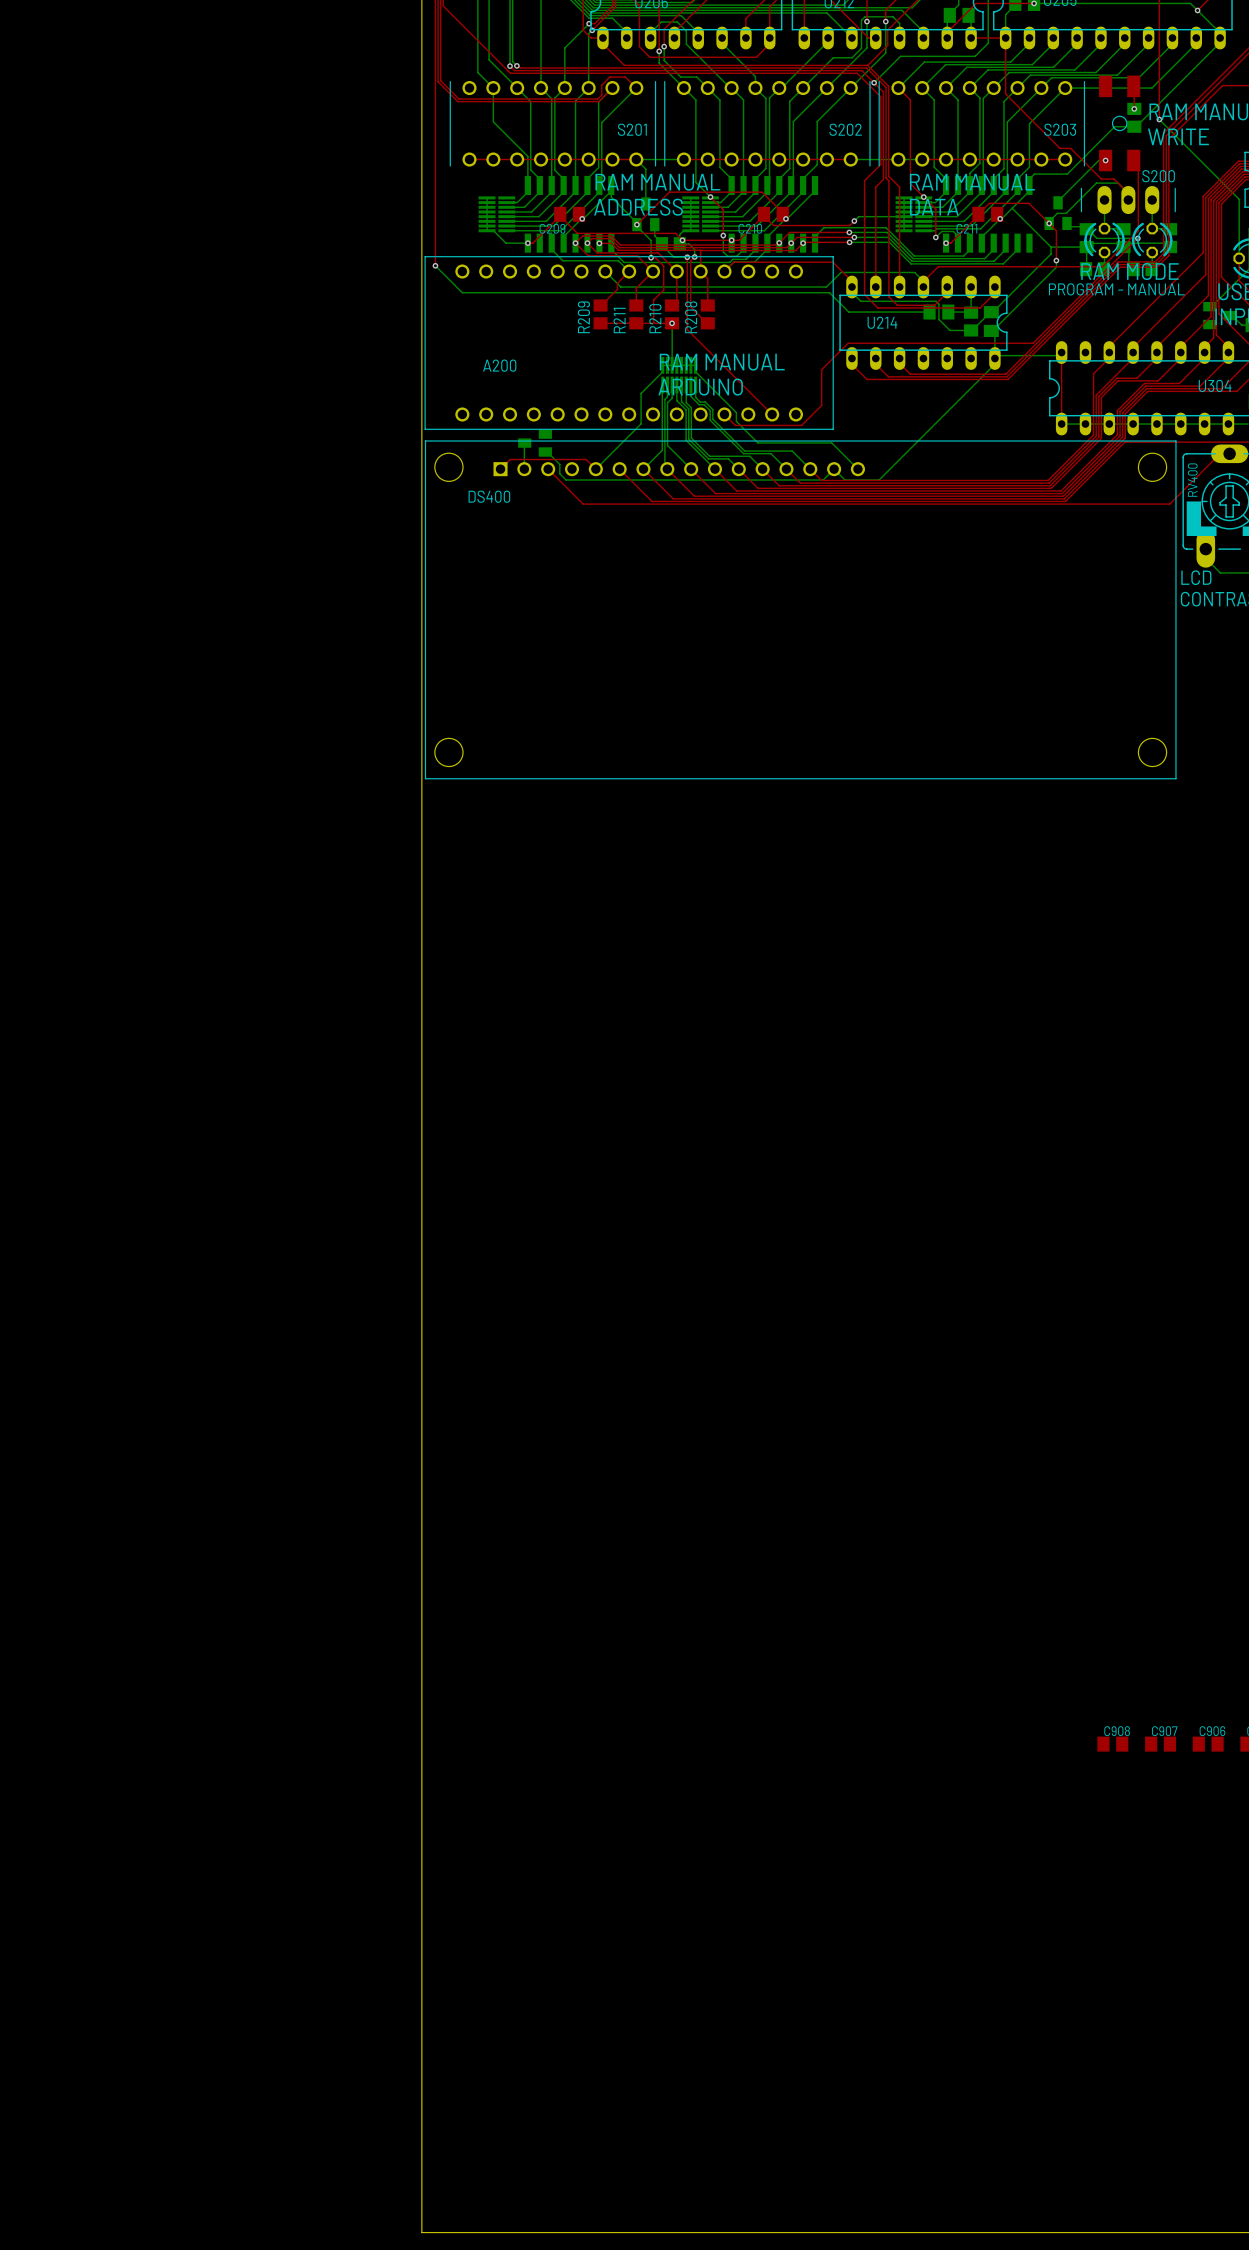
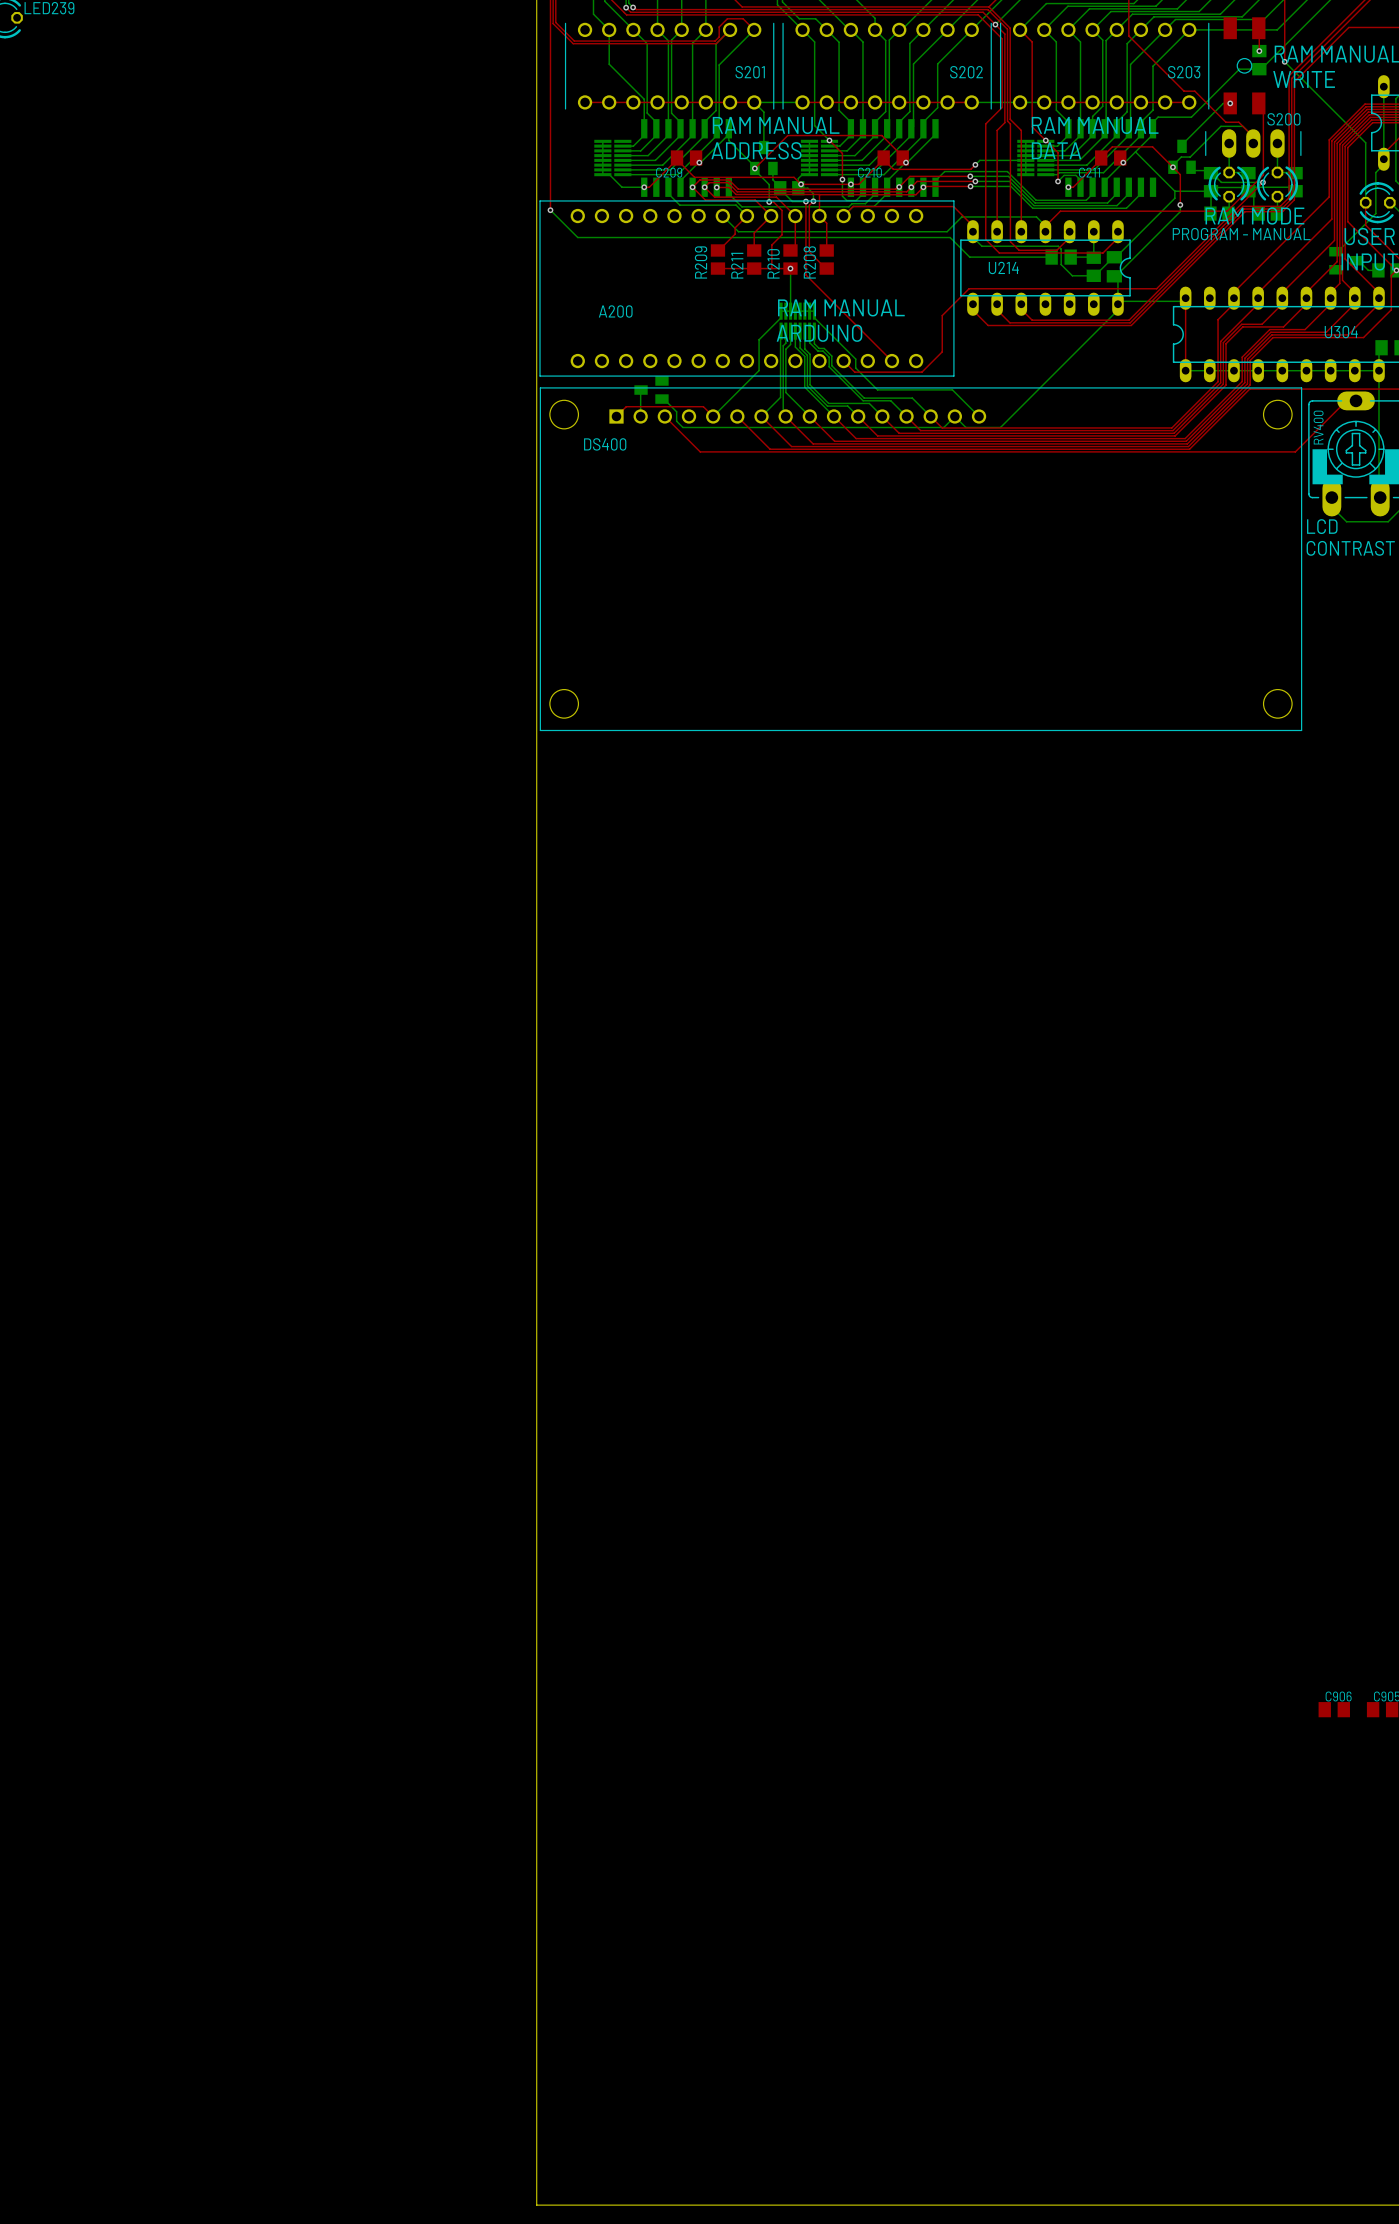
C908: (1112, 1744) -> none
C907: (1160, 1744) -> none

